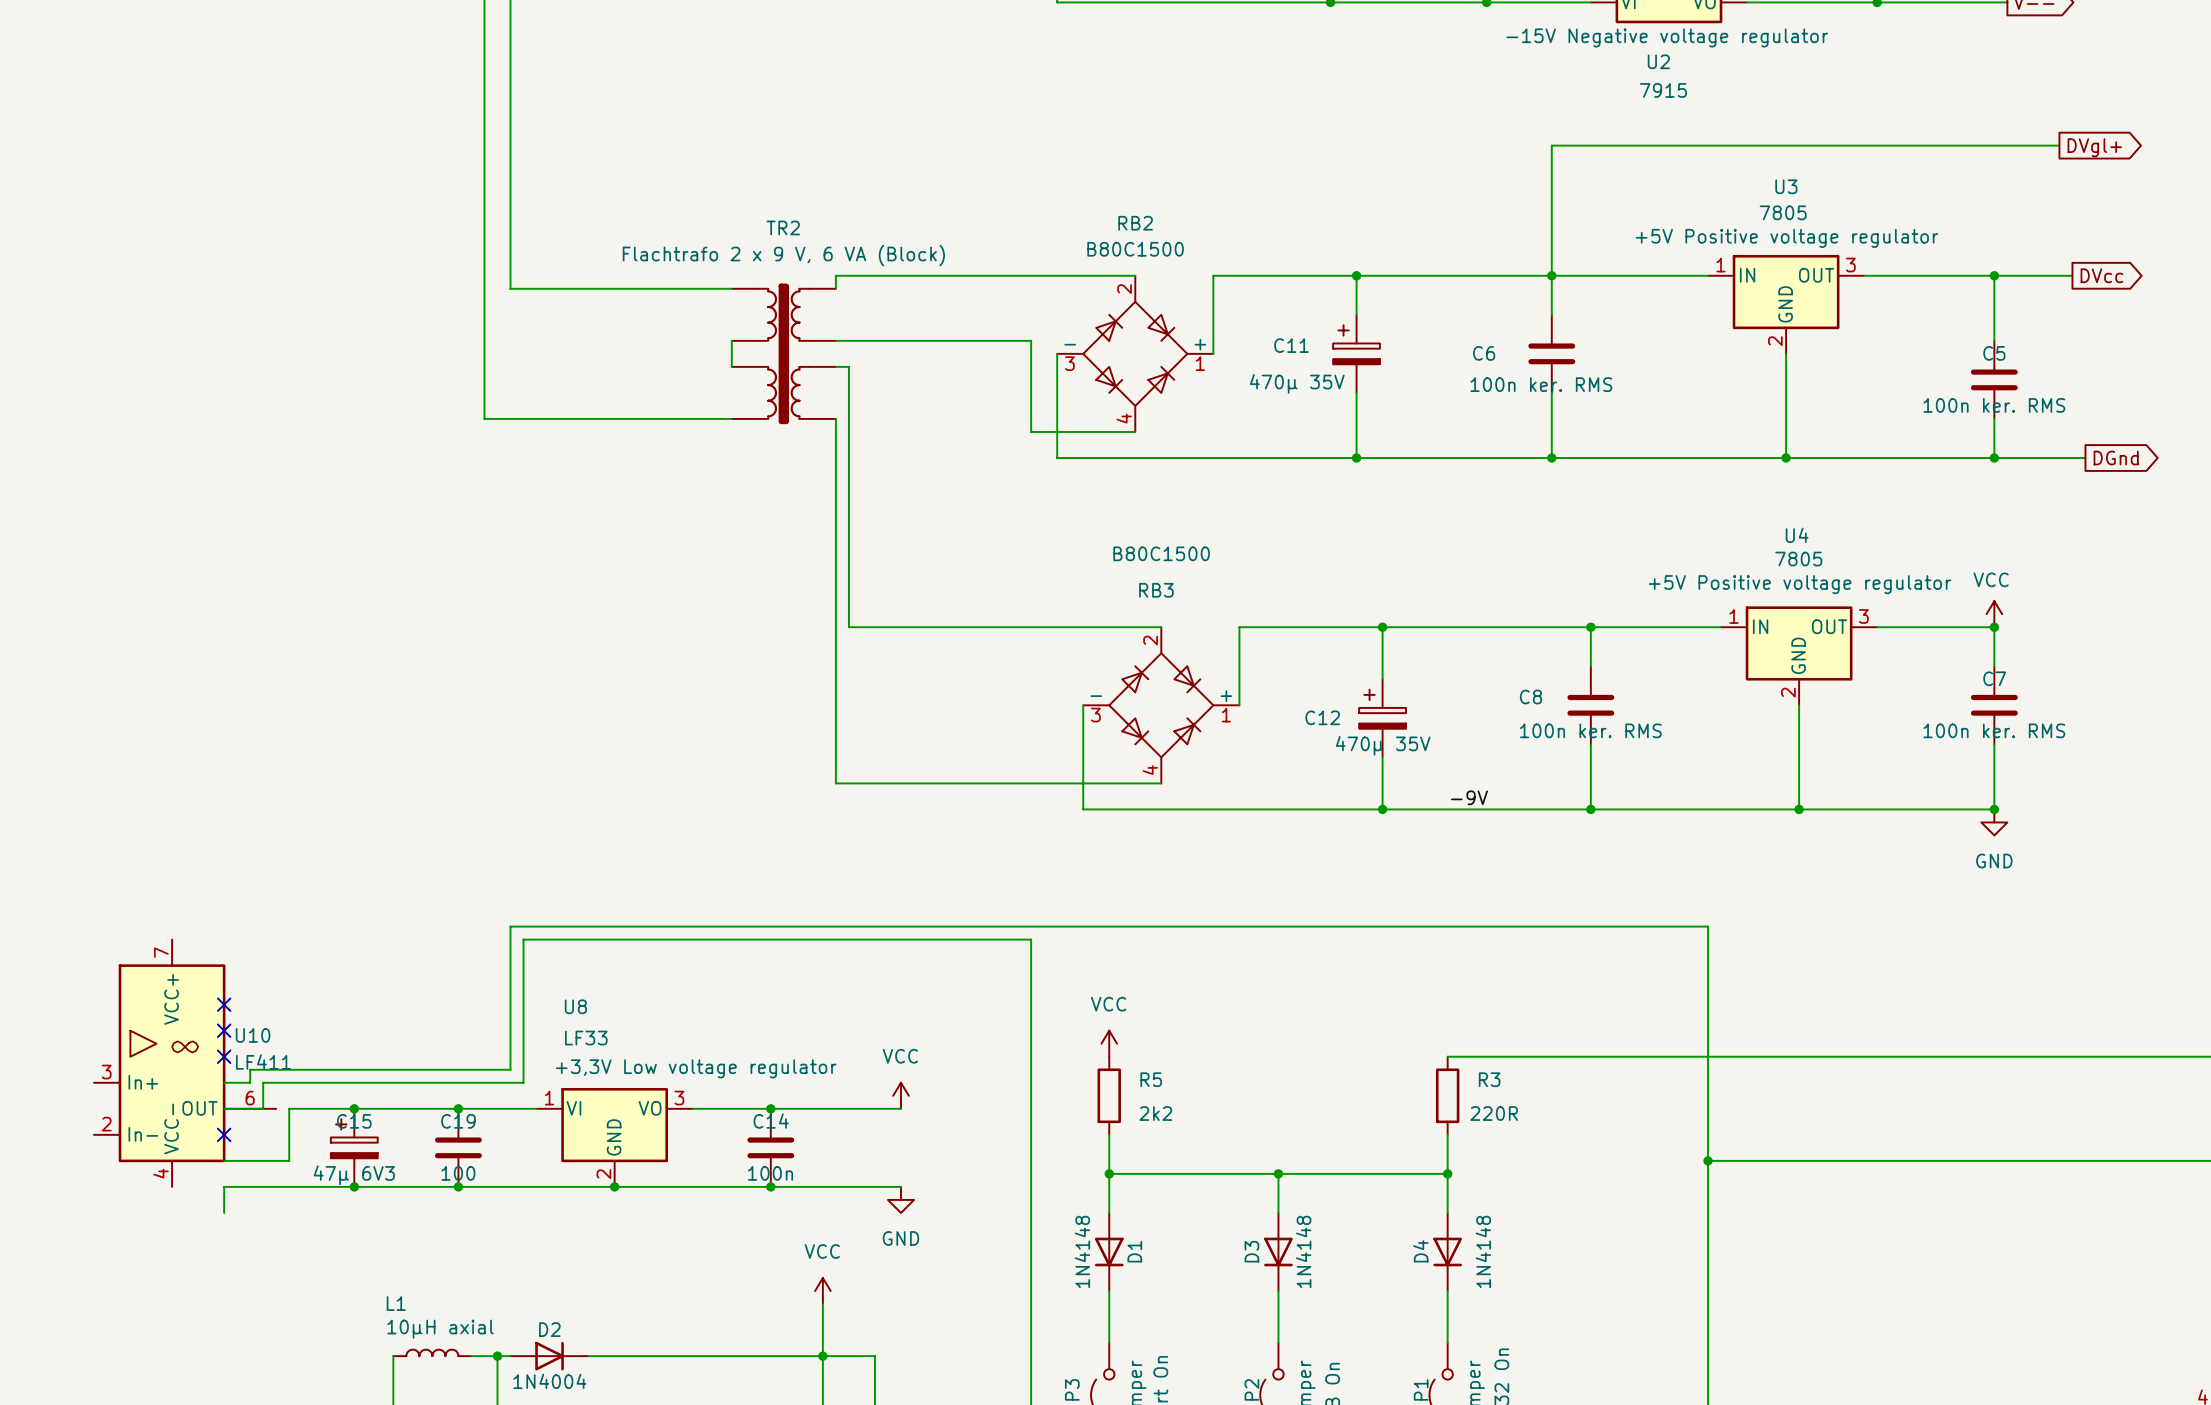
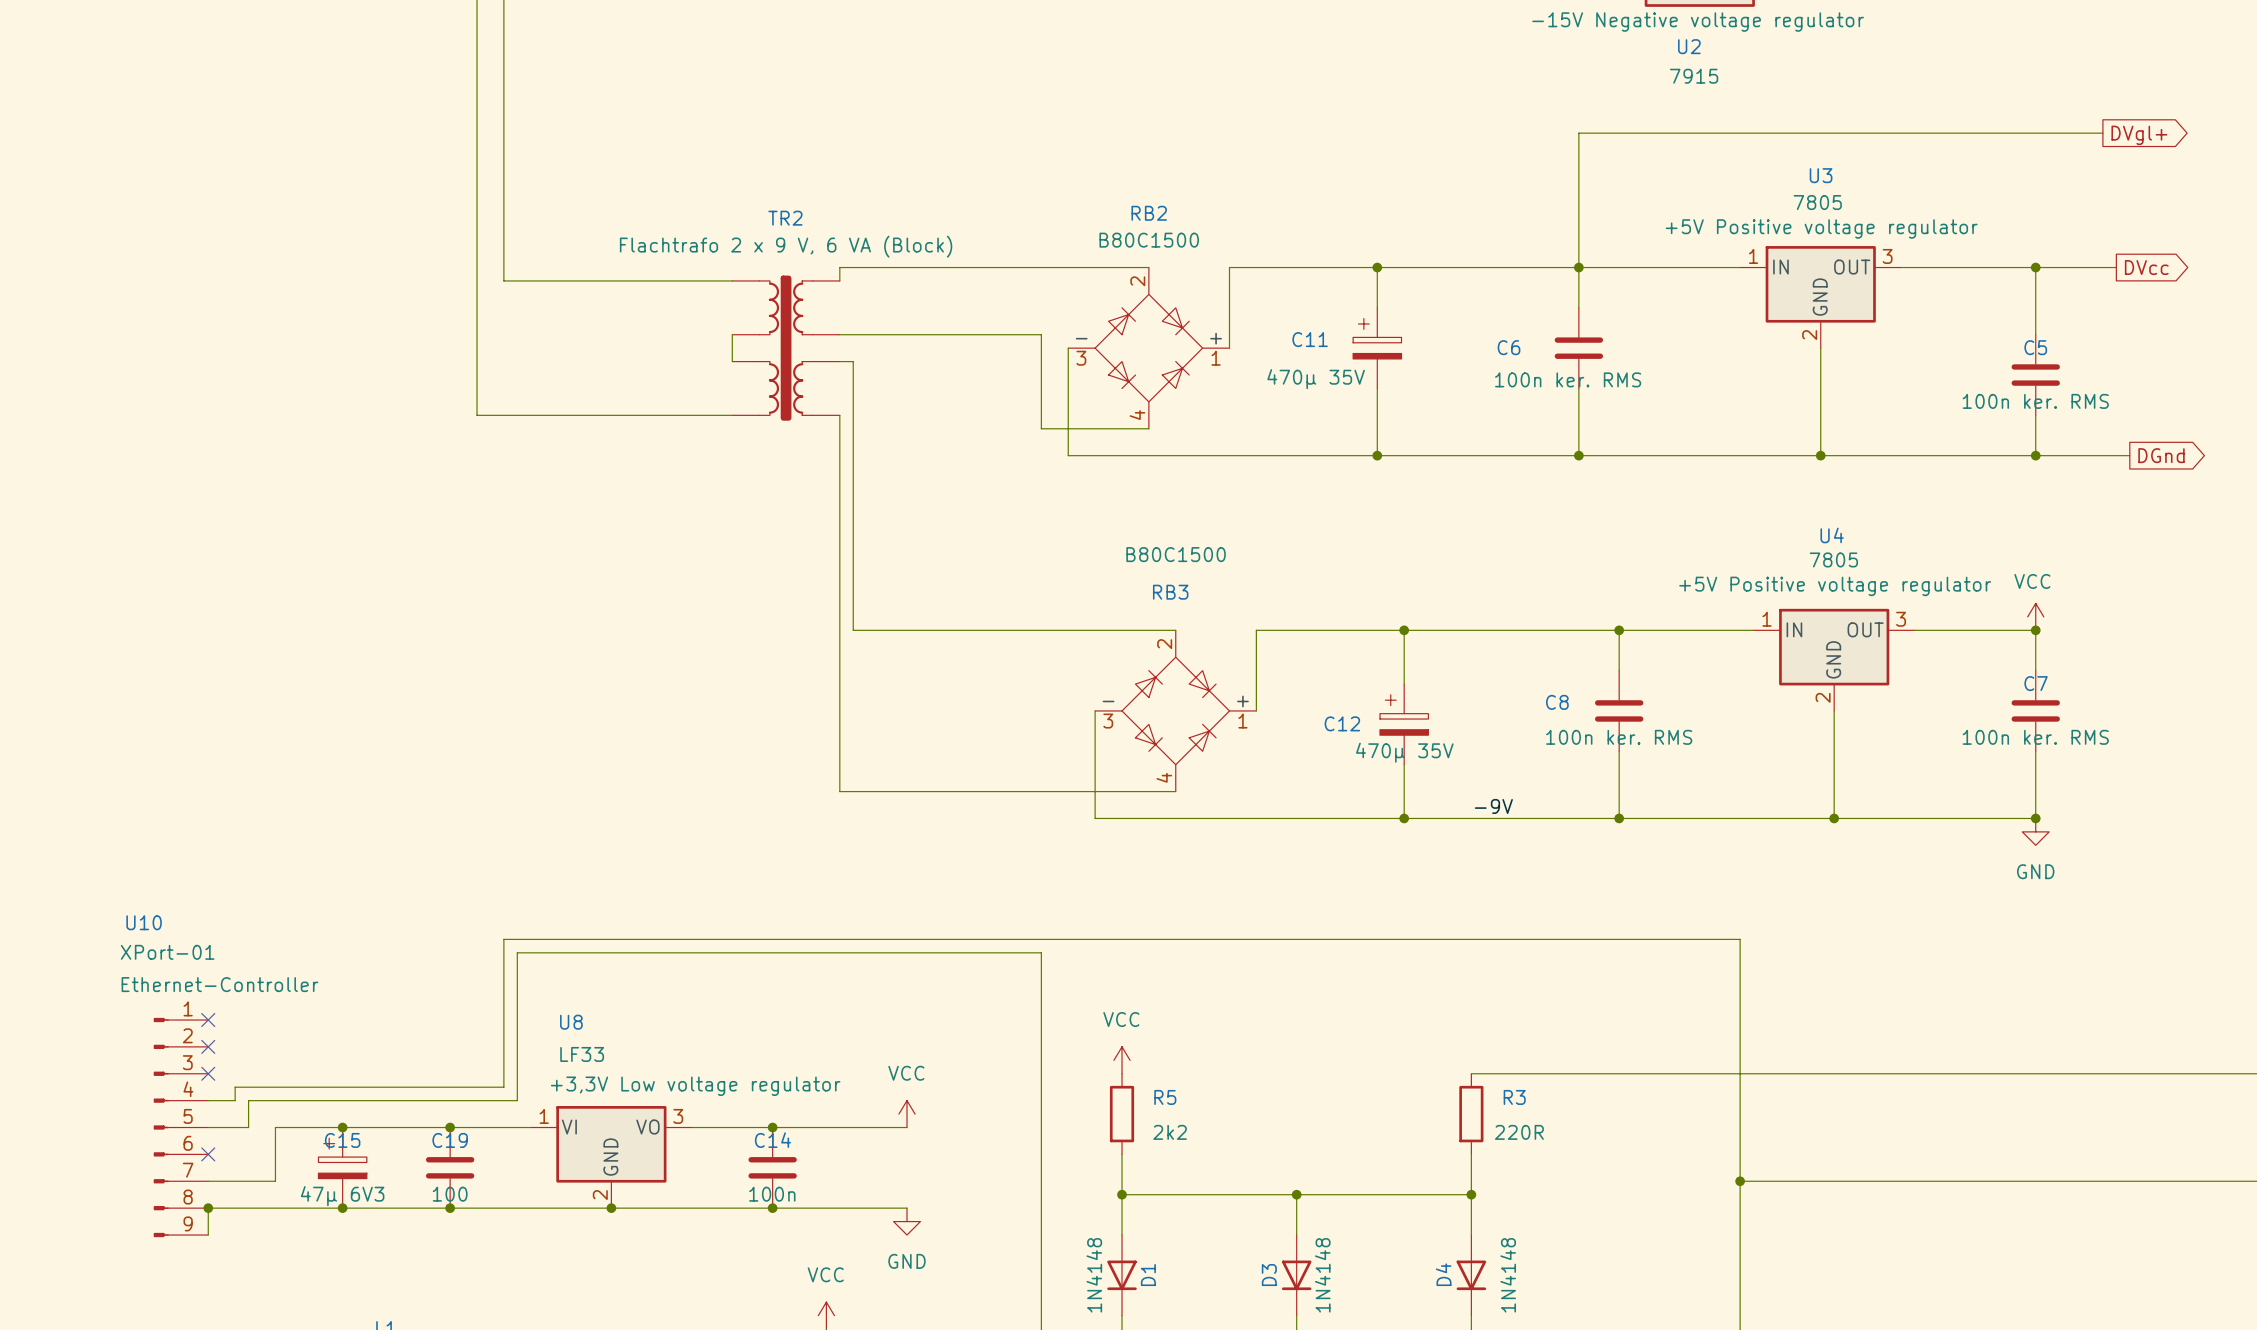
U10 symbol: [93, 939, 277, 1187] -> [153, 1017, 209, 1238]
U10 text: none -> Ethernet-Controller (219, 984)
U10 name position: U10 (253, 1035) -> U10 (144, 922)
U10 value: LF411 (263, 1062) -> XPort-01 (167, 952)
junction: none -> (208, 1208)

